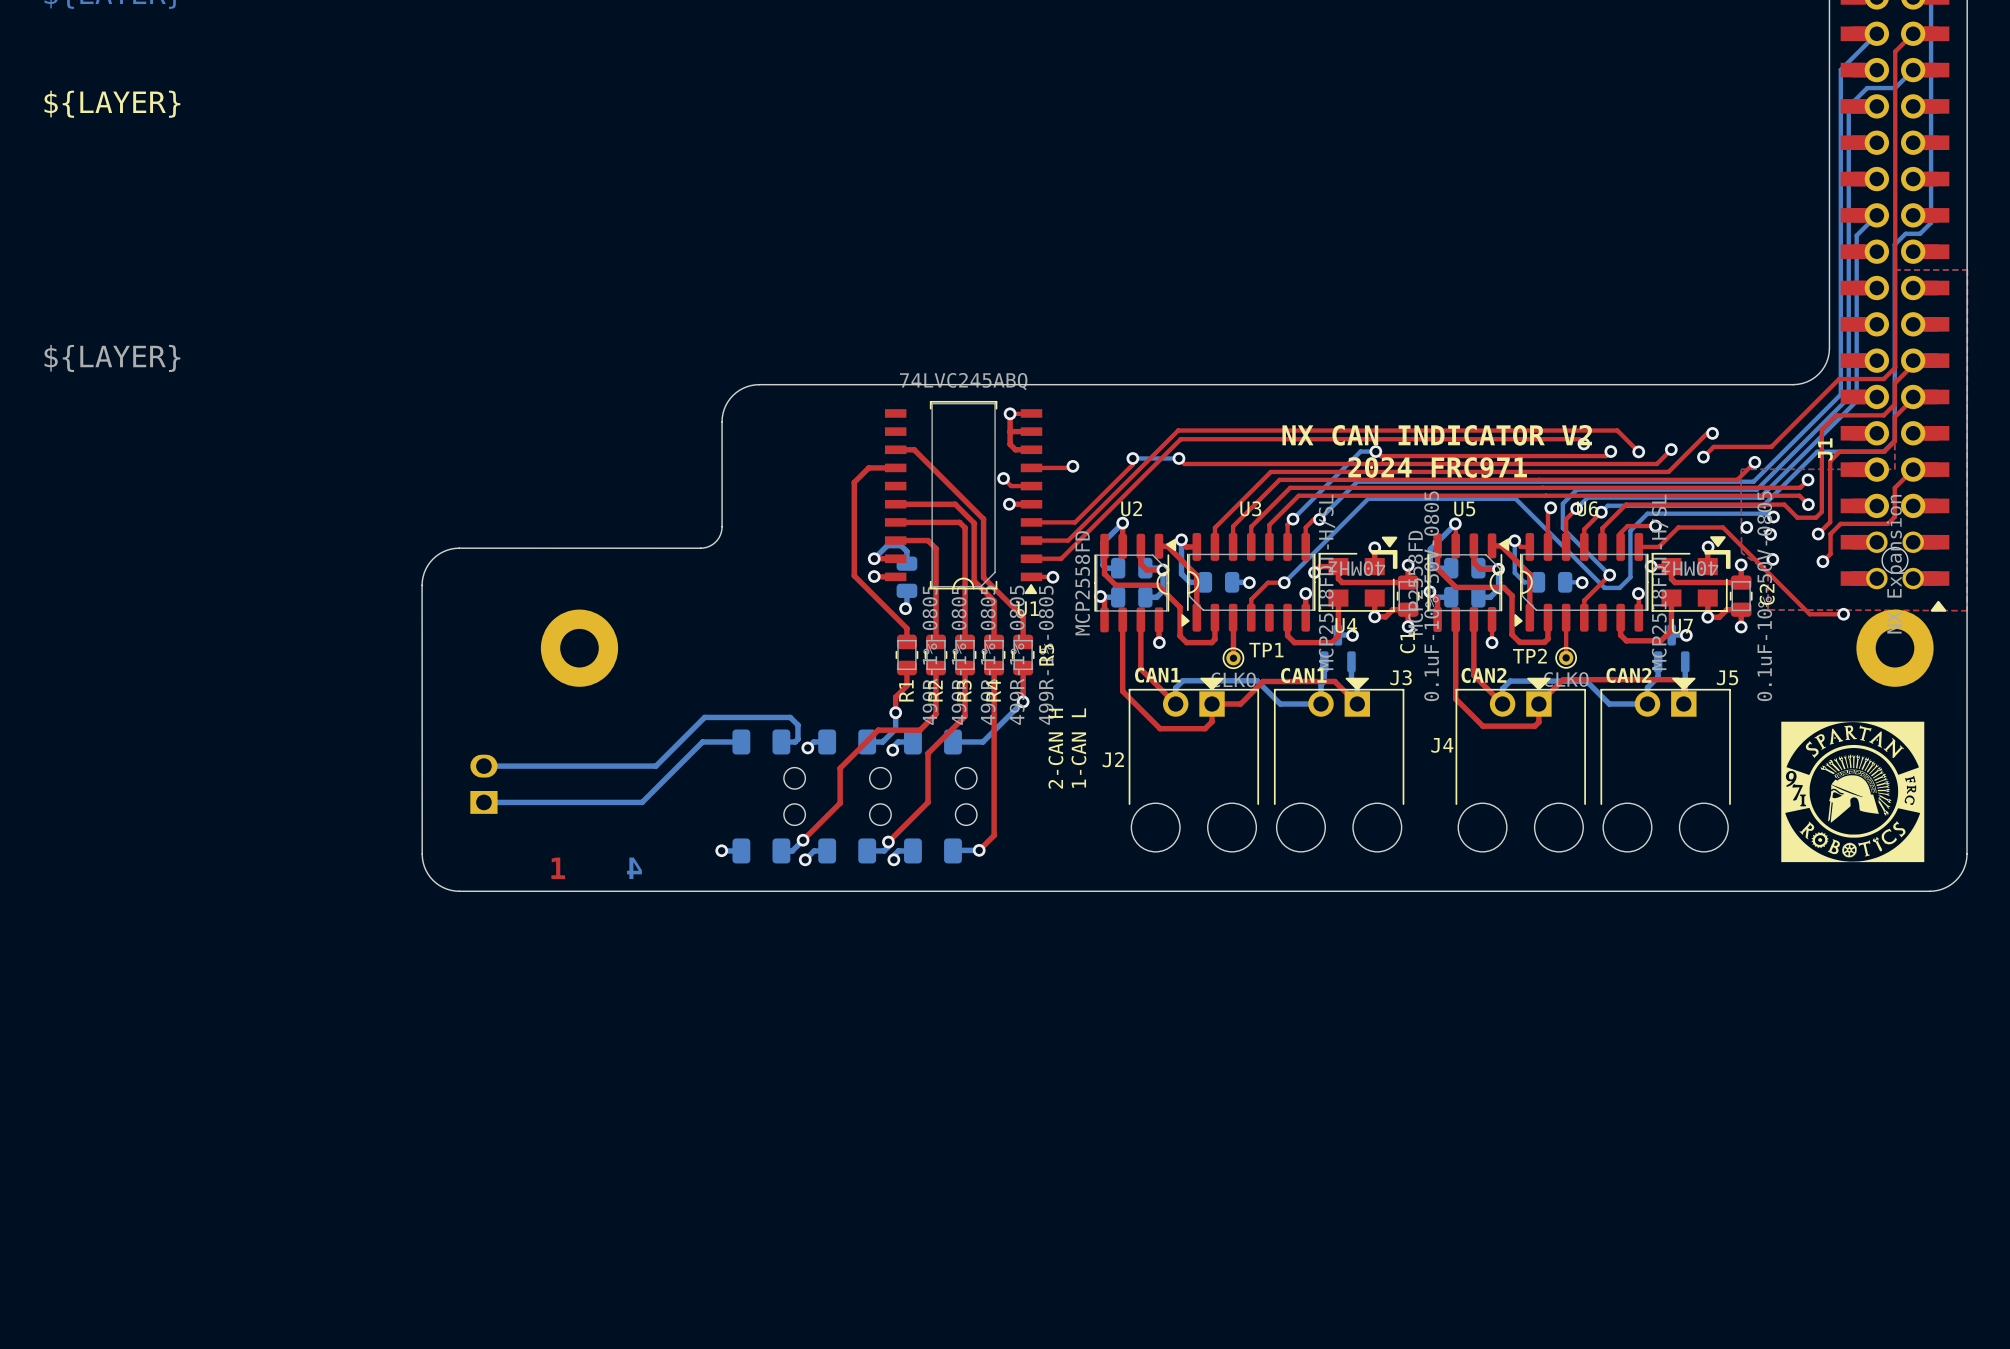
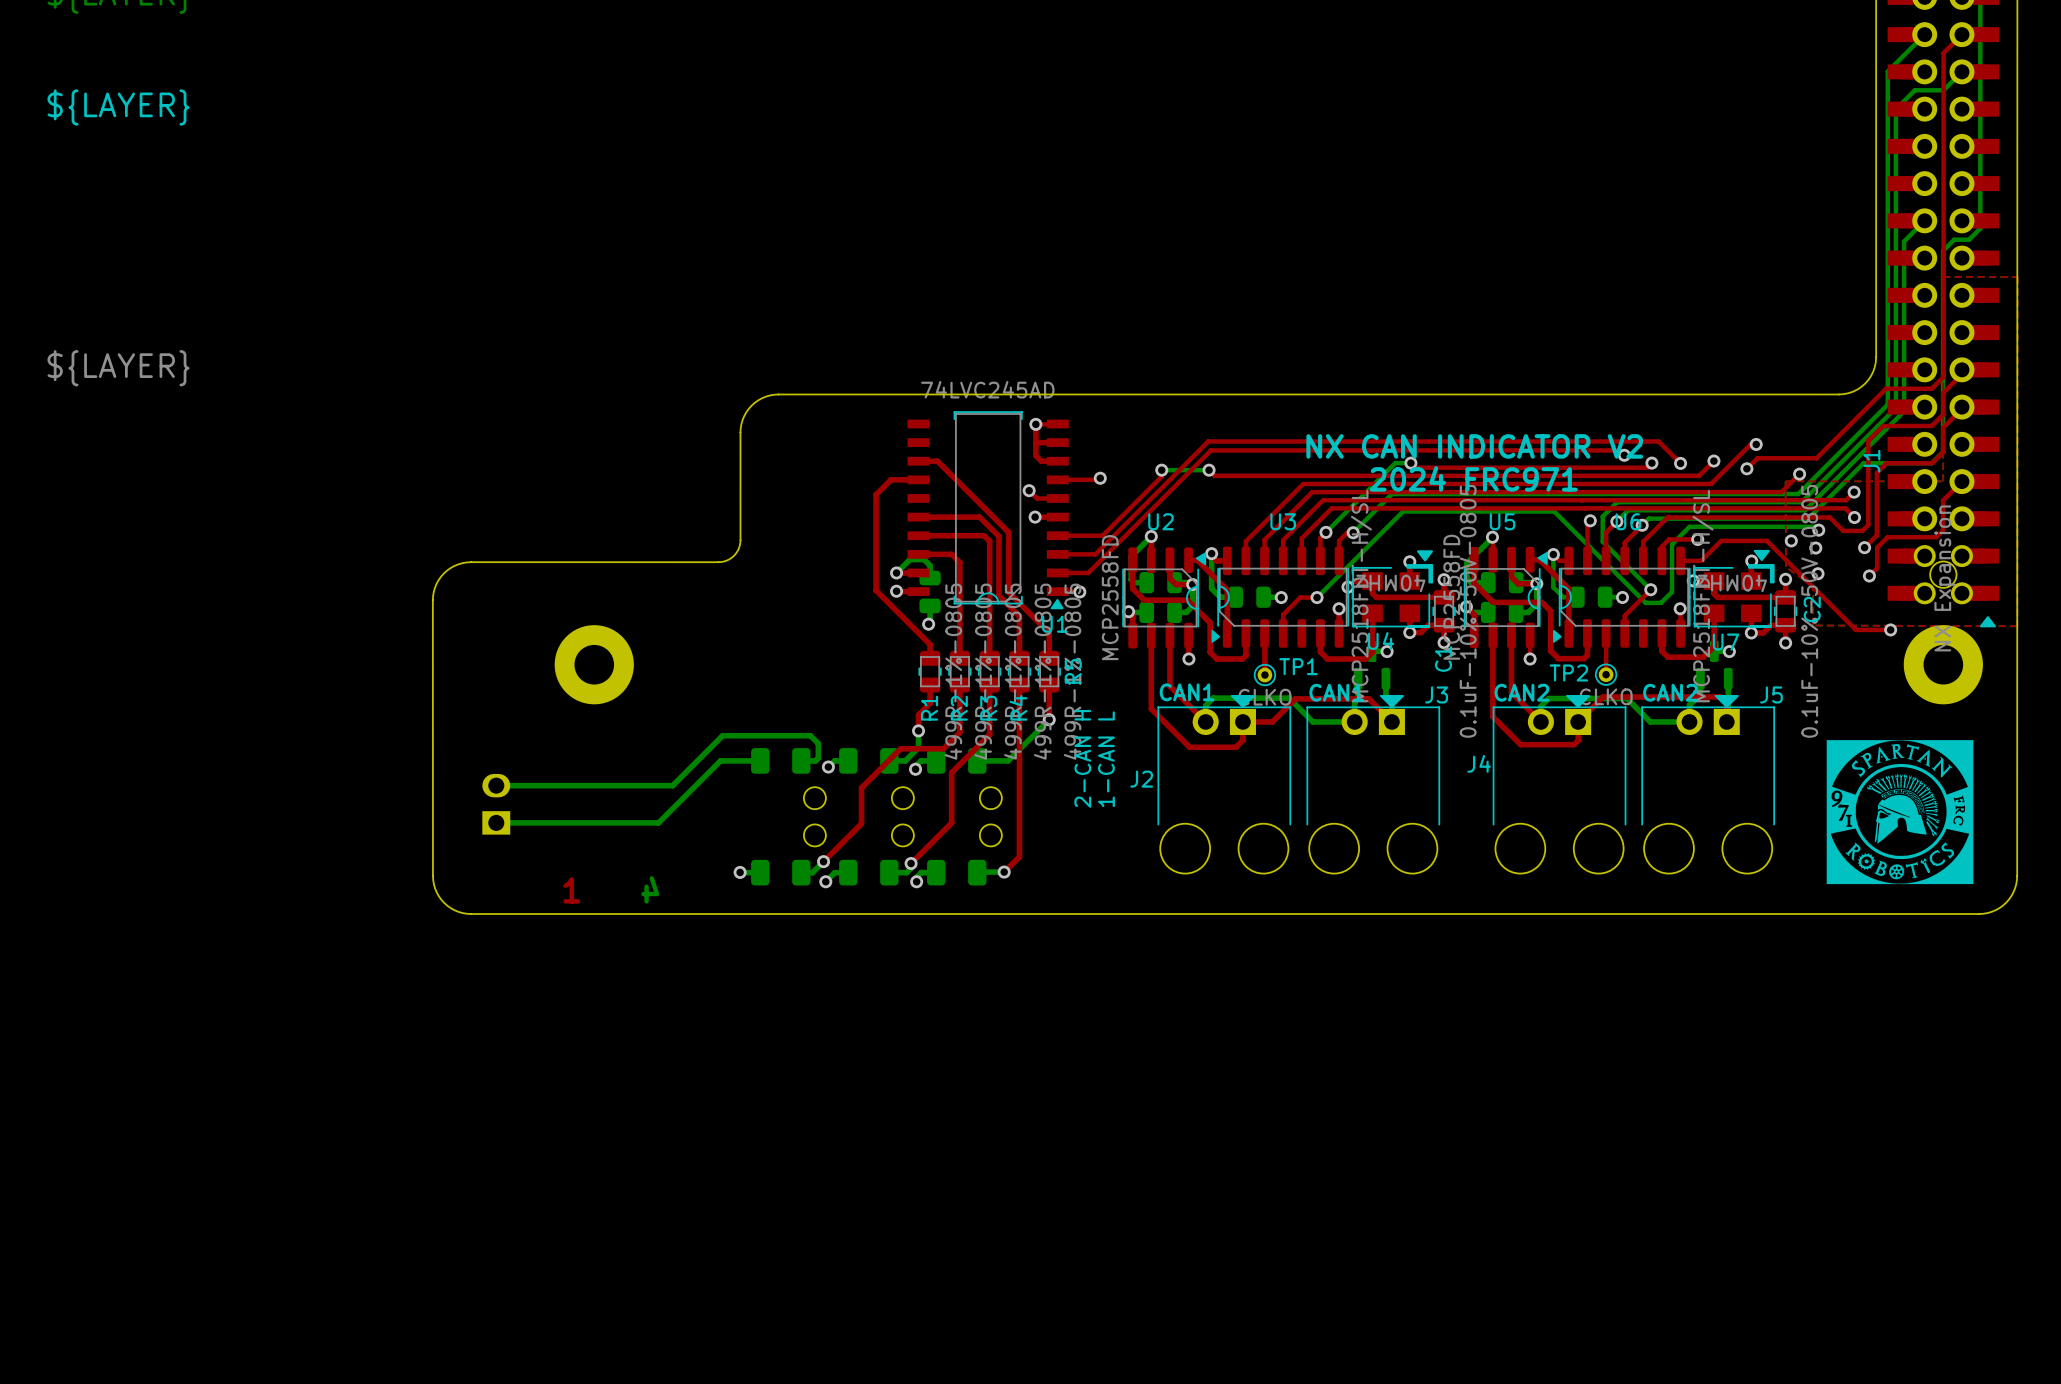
U1 value: 74LVC245ABQ (963, 381) -> 74LVC245AD (987, 389)

